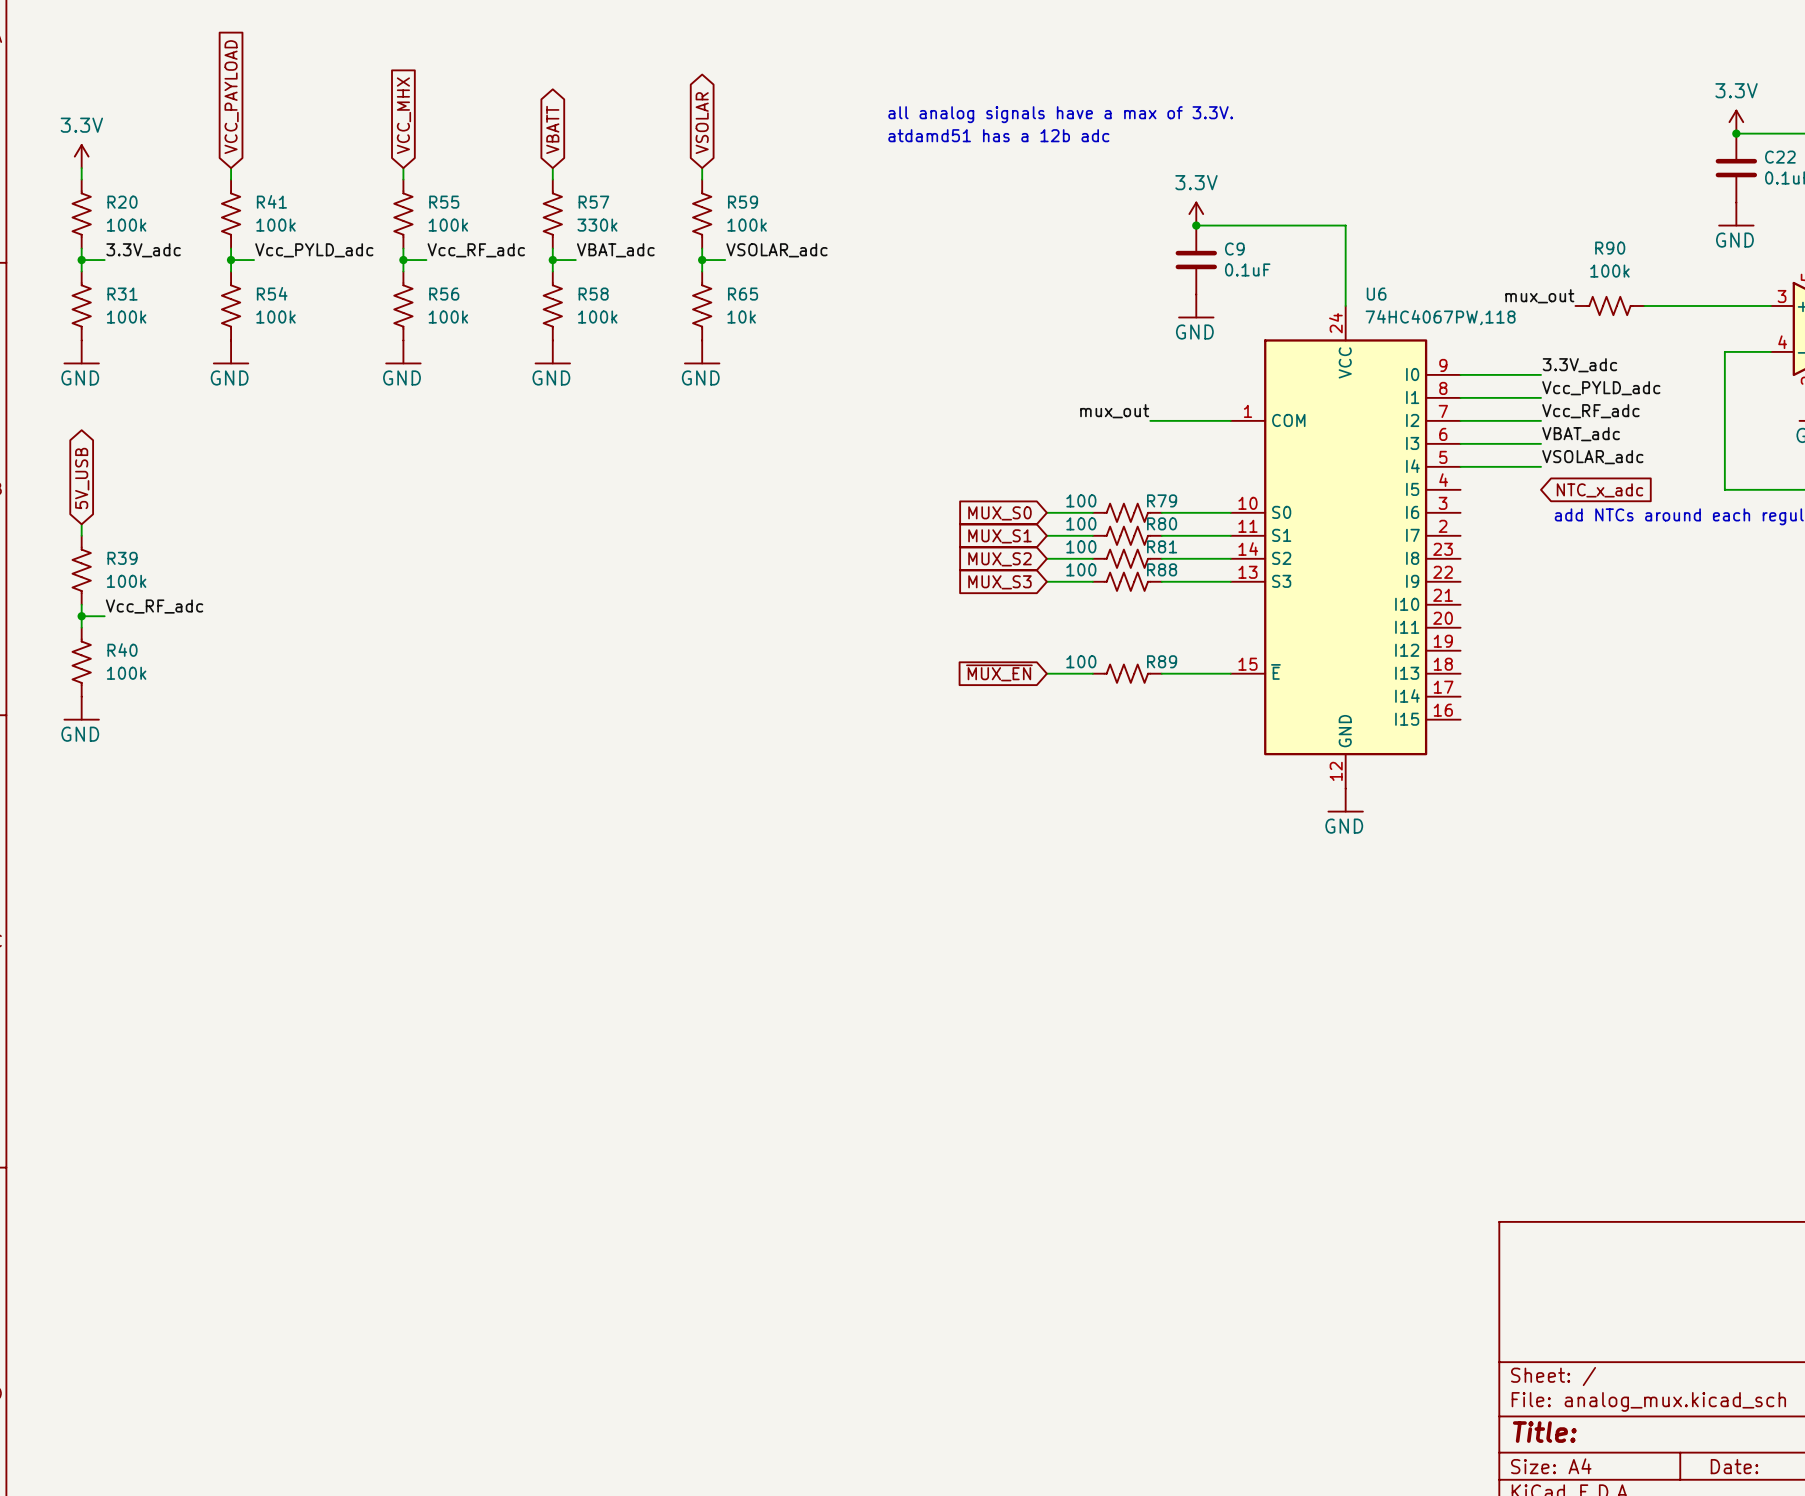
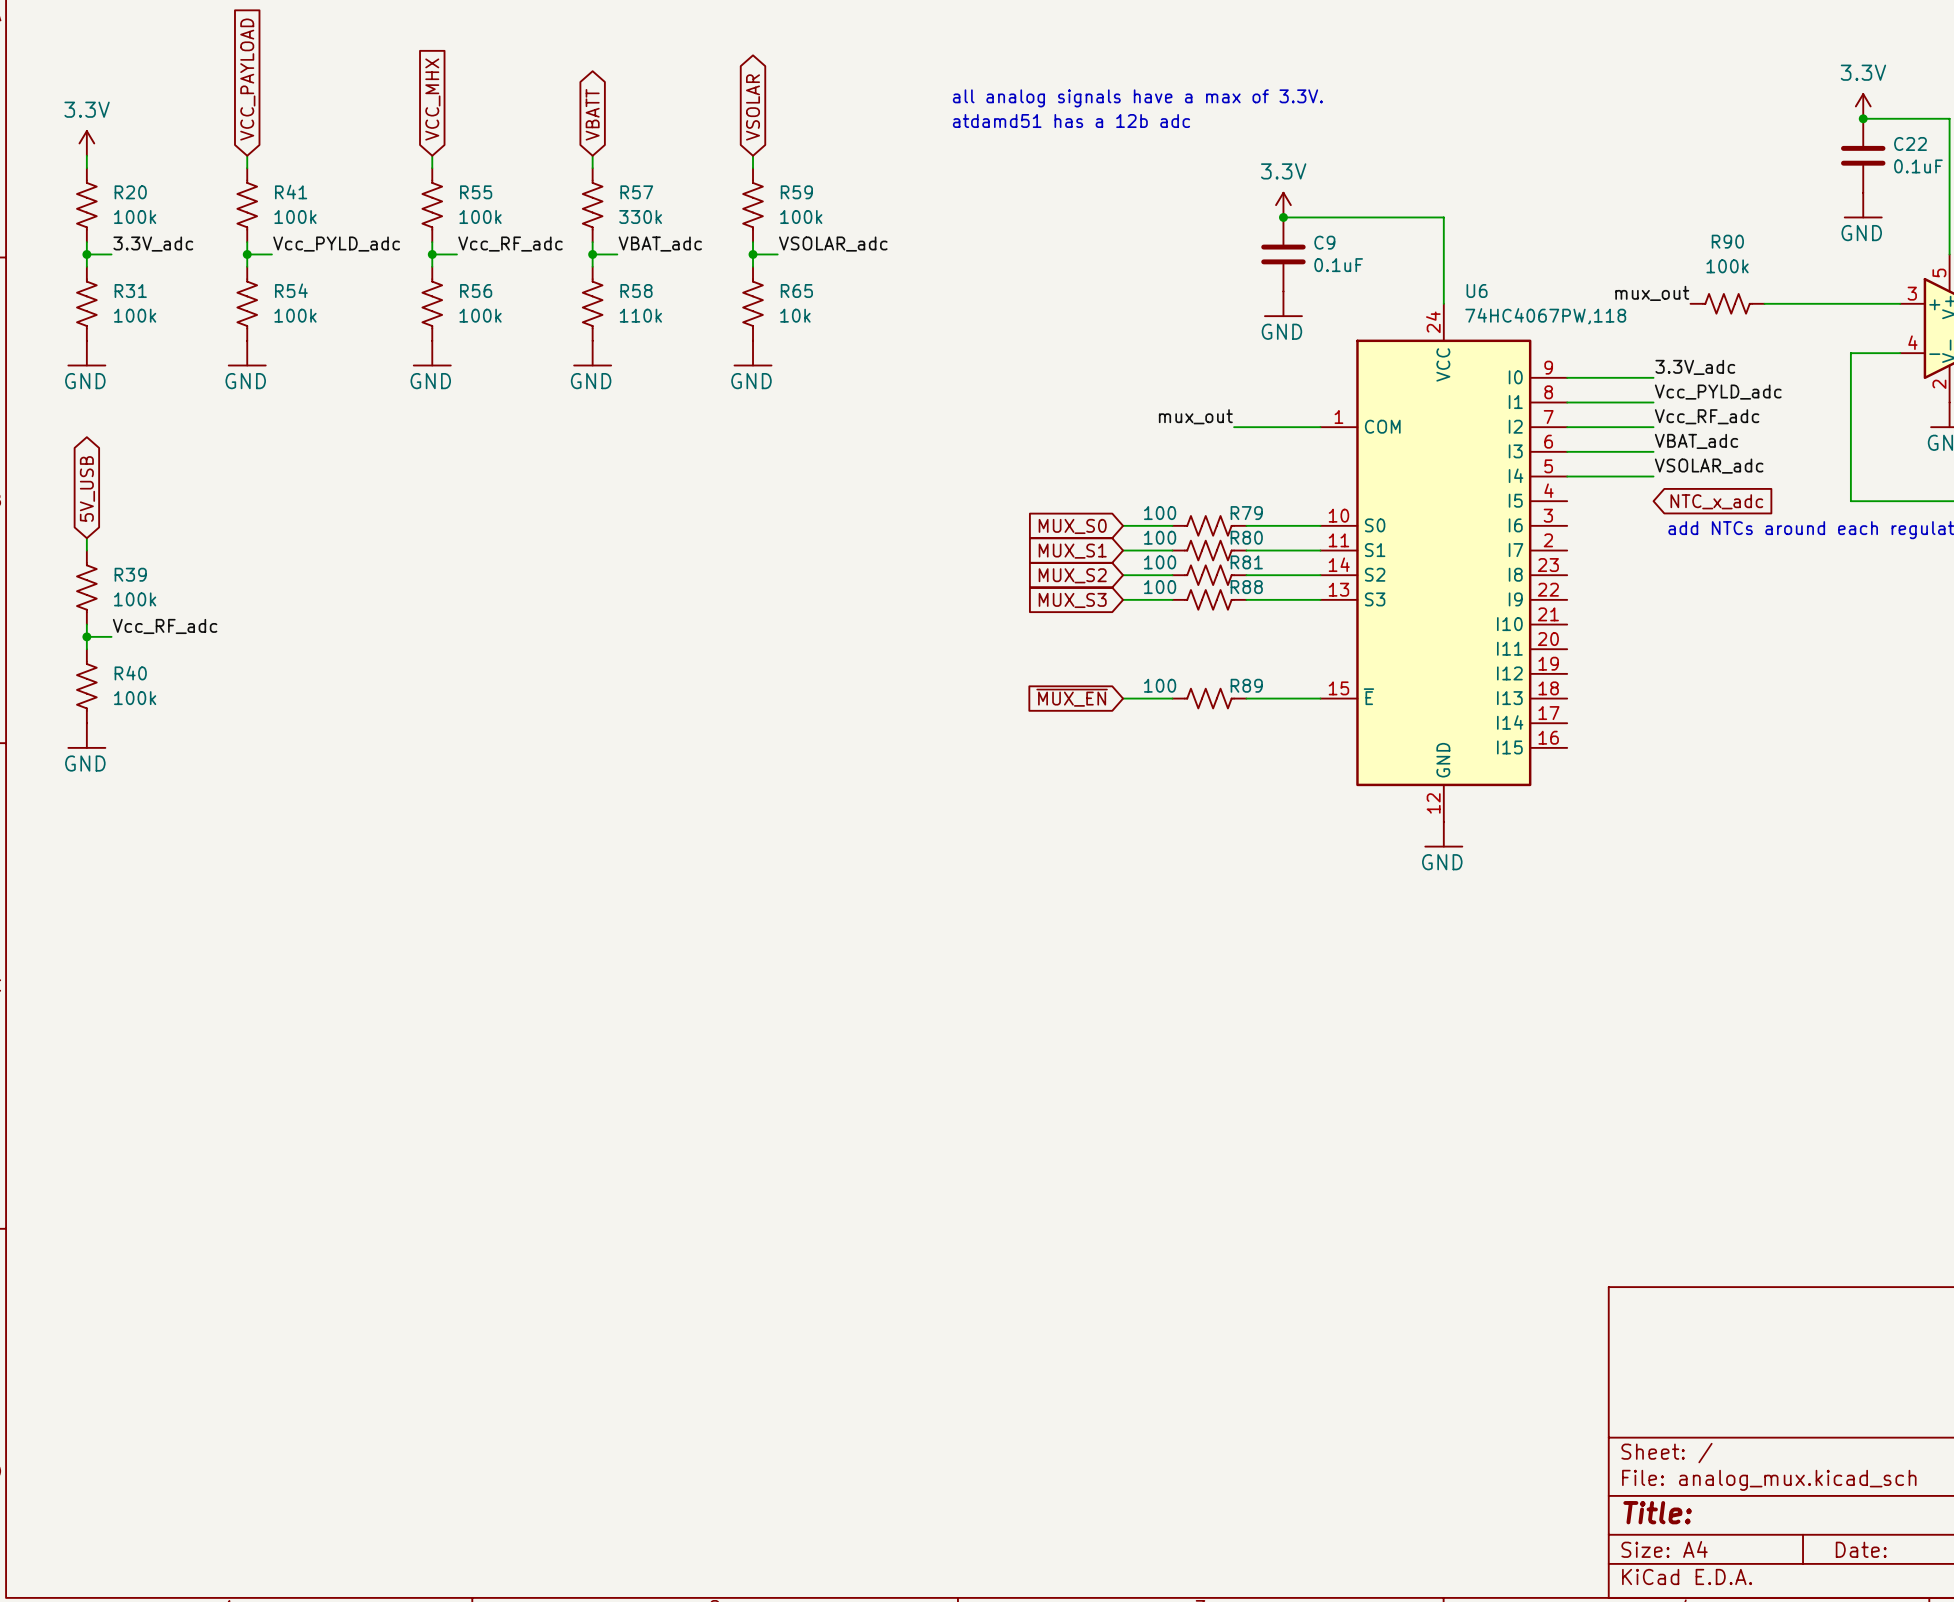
R58 value: 100k (597, 317) -> 110k (640, 315)

